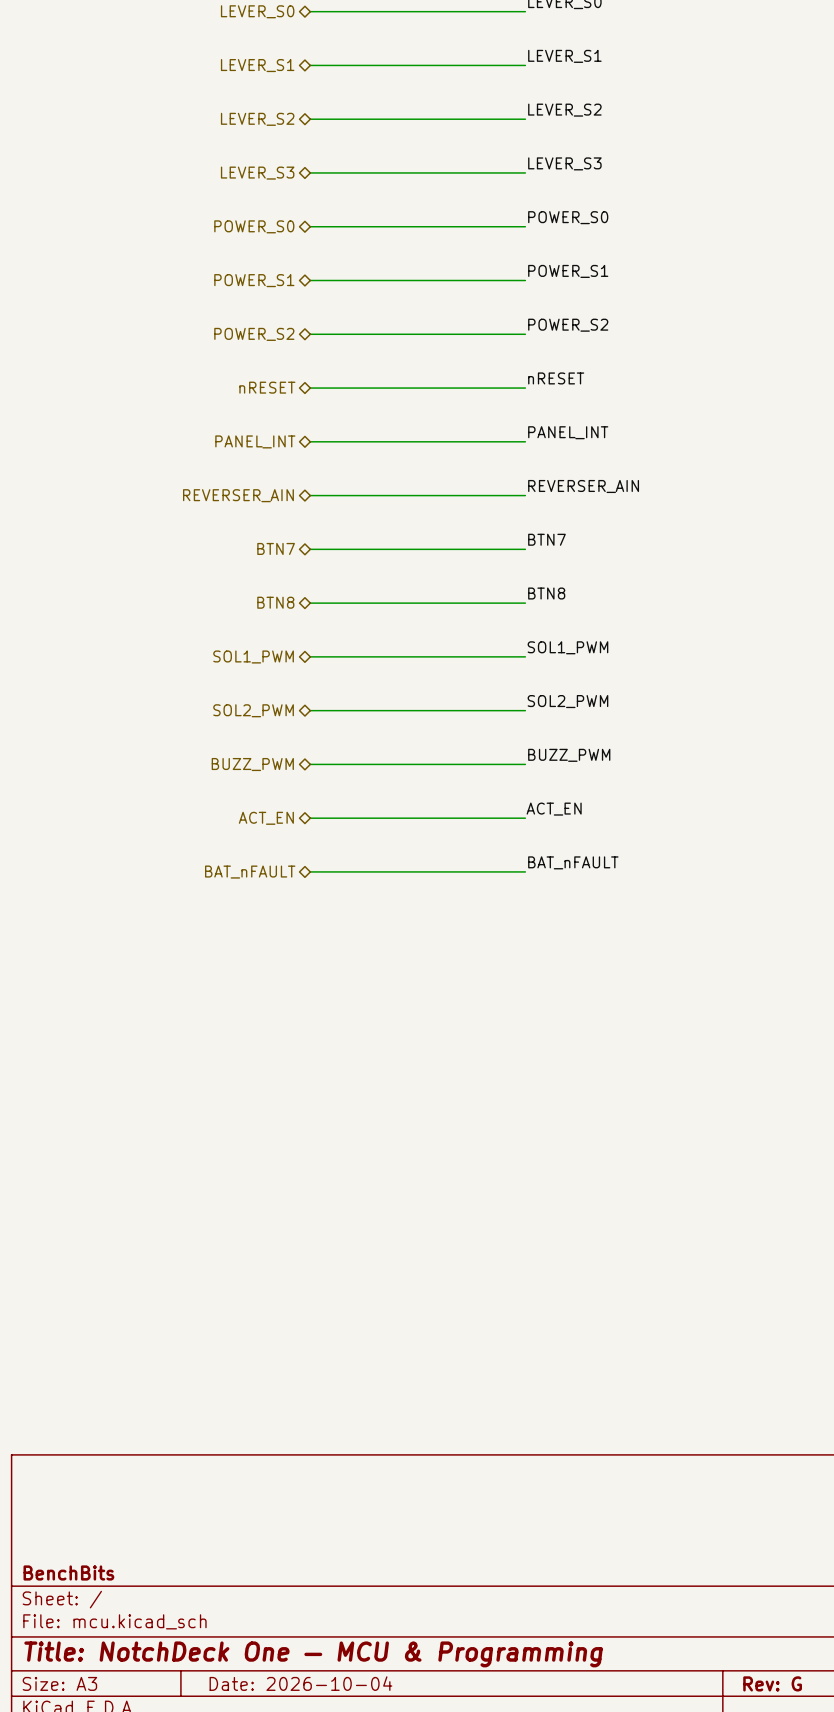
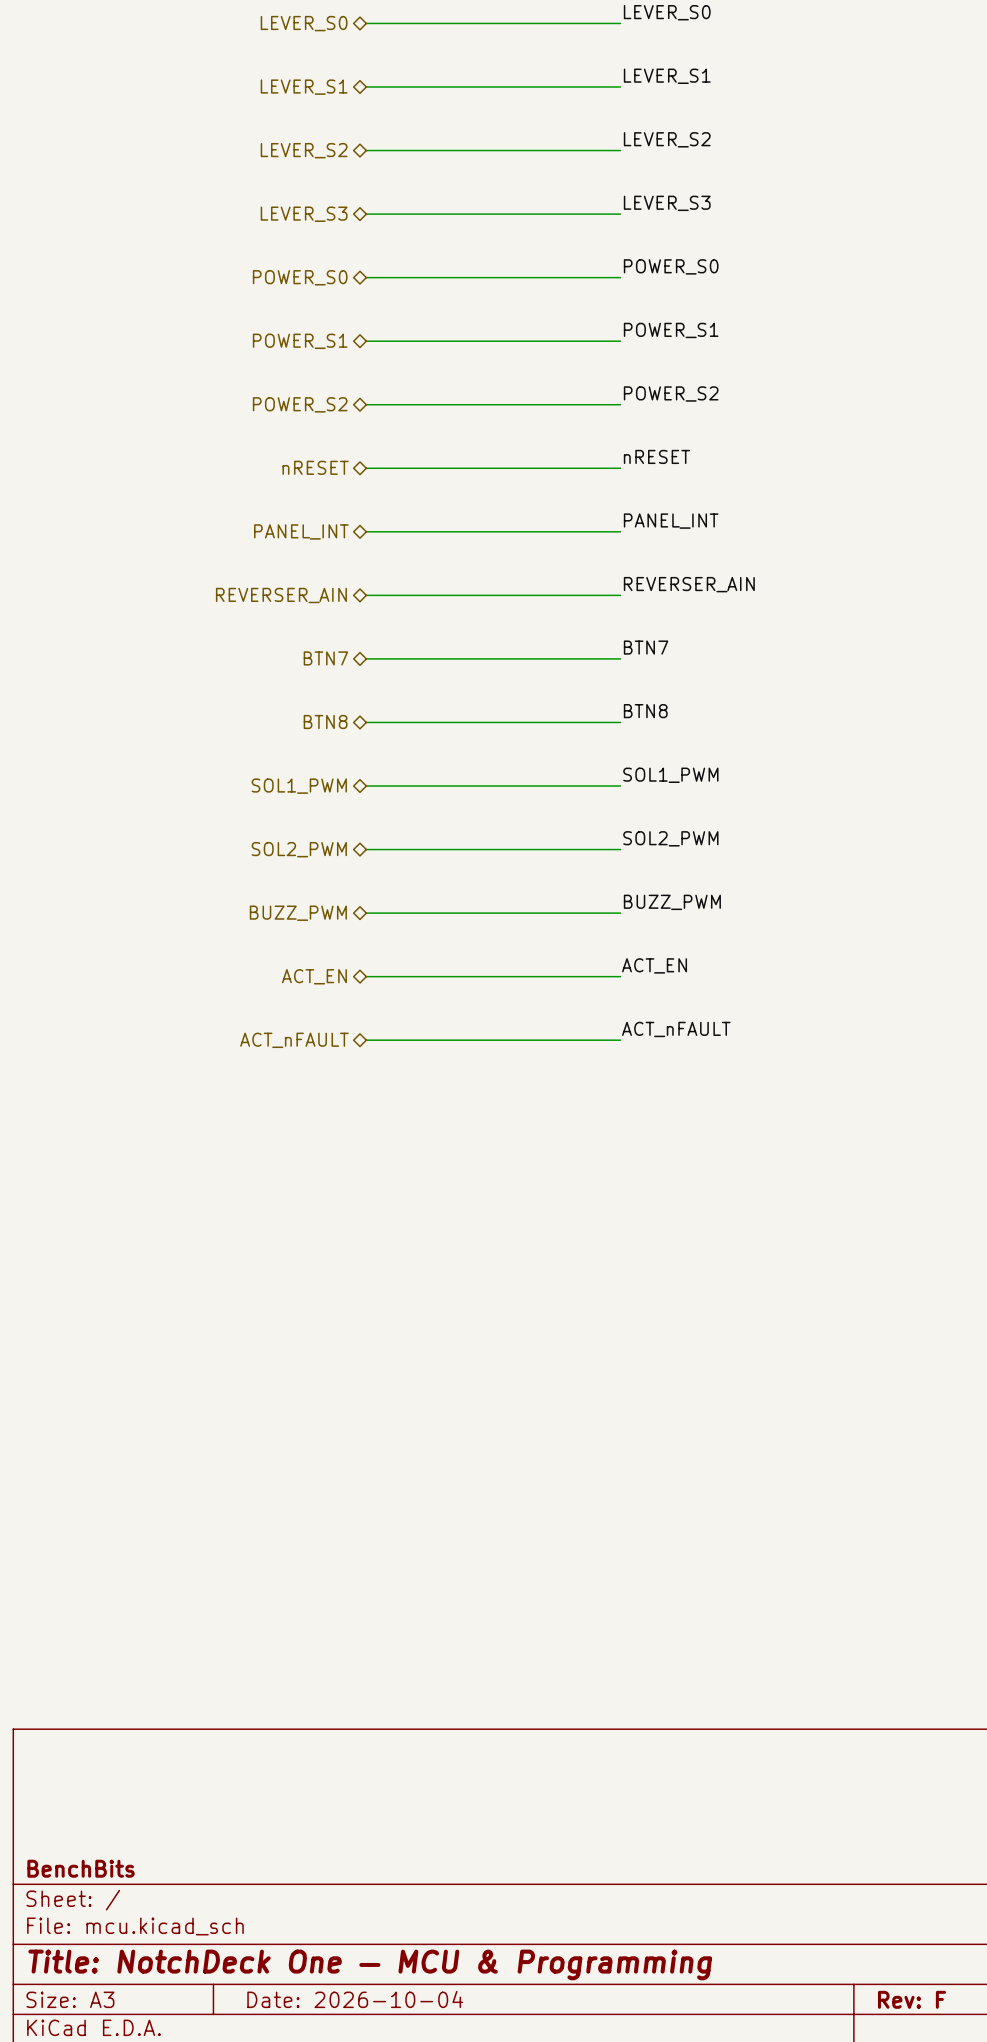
label: BAT_nFAULT (573, 862) -> ACT_nFAULT (676, 1029)
hierarchical label: BAT_nFAULT (250, 872) -> ACT_nFAULT (294, 1040)
title block: Rev: G (772, 1683) -> Rev: F (911, 1999)

